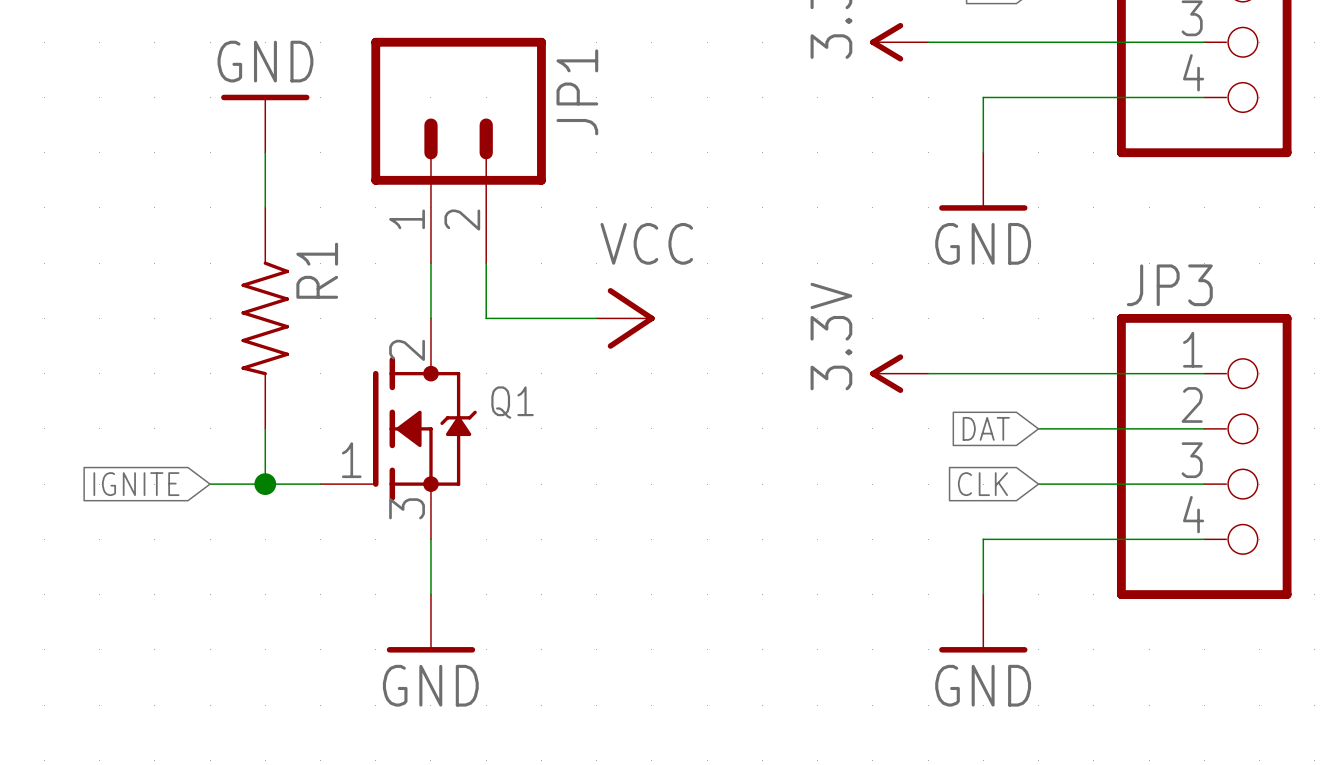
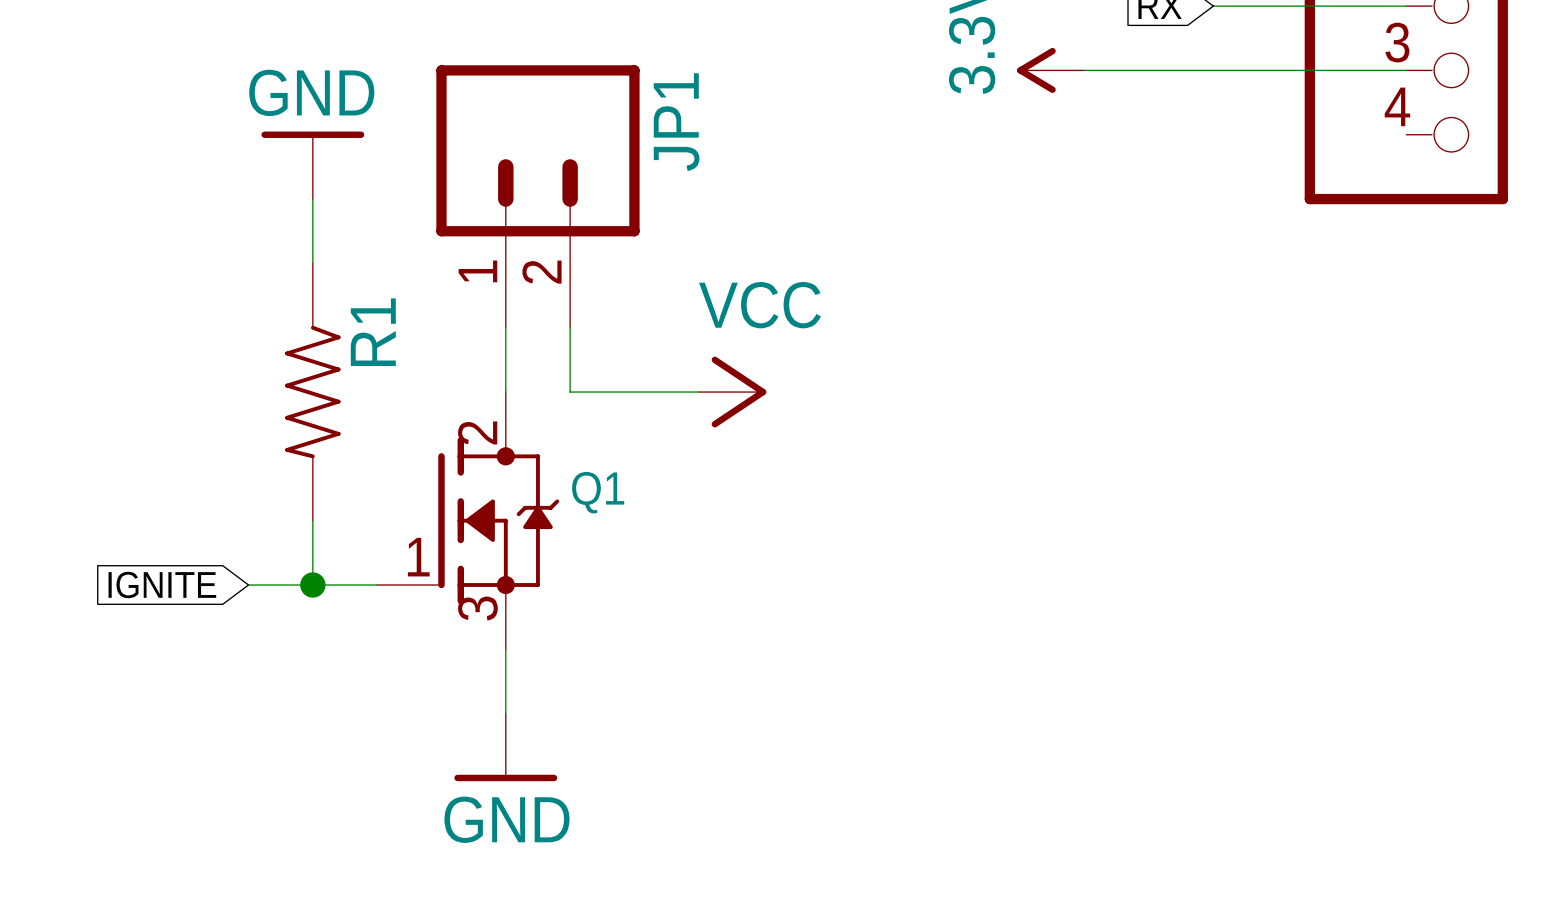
wire: (1204, 97) (983, 97) (983, 152) -> none
power symbol: GND (983, 181) -> none
power symbol: 3.3V (899, 373) -> none
wire: (928, 373) (1204, 373) -> none
global label: DAT (986, 428) -> none
wire: (1038, 428) (1204, 428) -> none
JP3: (1204, 456) -> none
global label: CLK (982, 484) -> none
wire: (1038, 484) (1204, 484) -> none
wire: (1204, 539) (983, 539) (983, 594) -> none
power symbol: GND (983, 623) -> none

